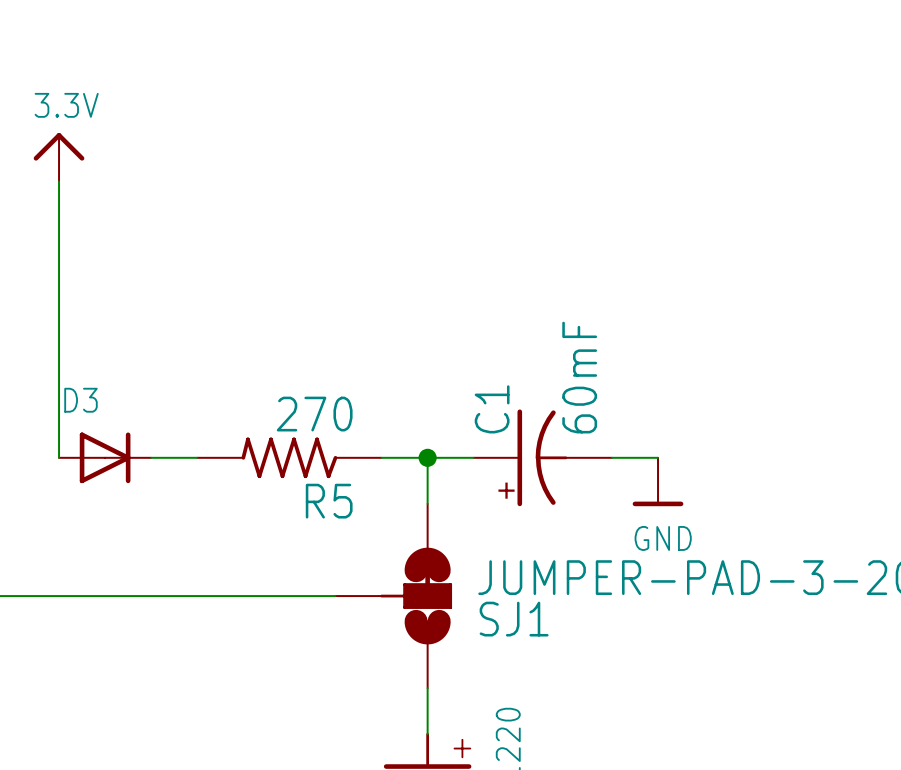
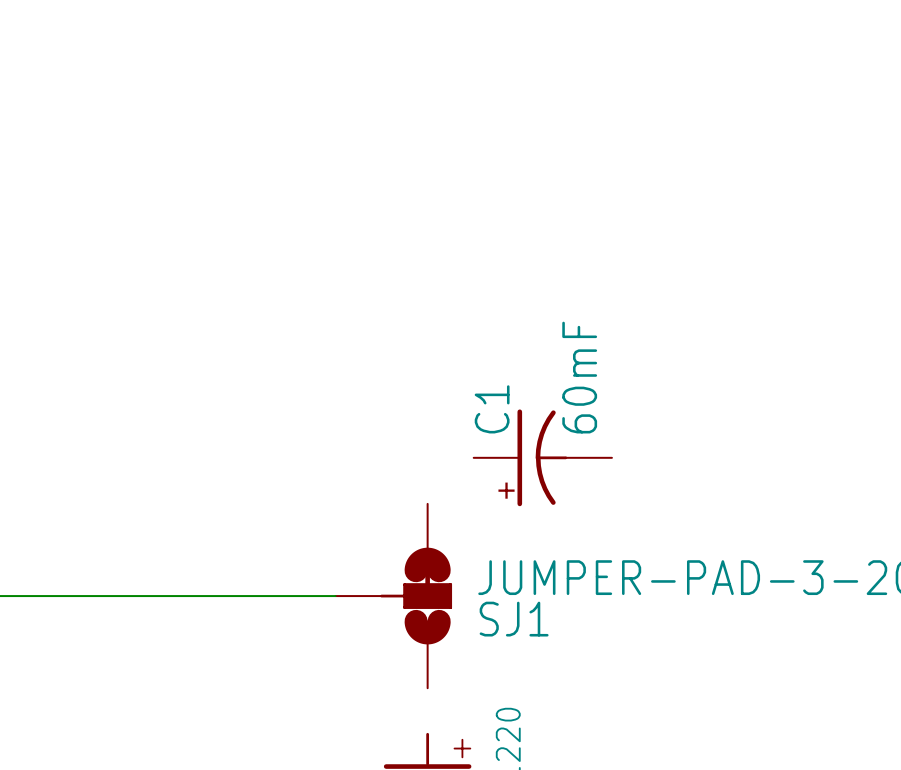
power symbol: 3.3V (59, 157) -> none
wire: (59, 181) (59, 457) -> none
D3: (105, 457) -> none
wire: (151, 457) (197, 457) -> none
R5: 270 (289, 457) -> none
wire: (381, 457) (473, 457) -> none
wire: (427, 457) (427, 503) -> none
junction: (427, 457) -> none
wire: (611, 457) (658, 457) -> none
power symbol: GND (658, 482) -> none
wire: (427, 688) (427, 734) -> none

